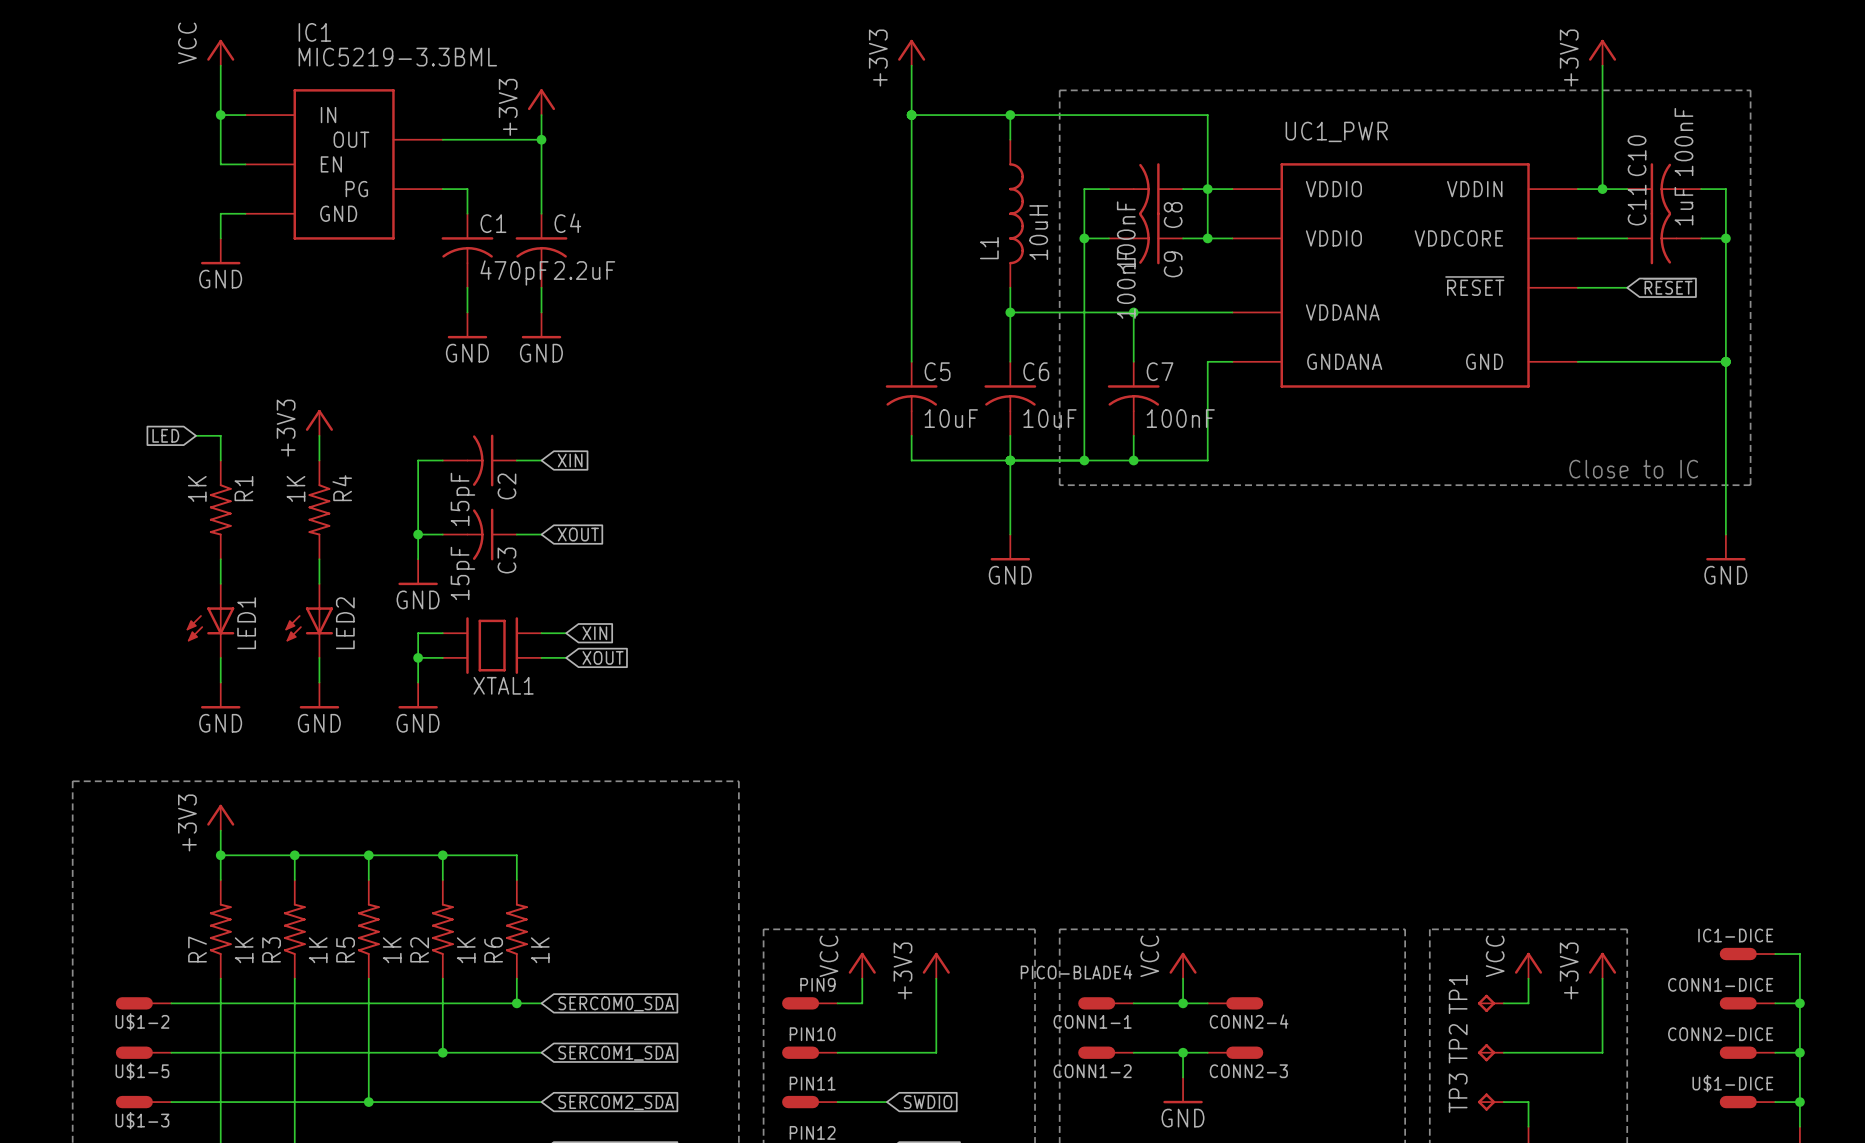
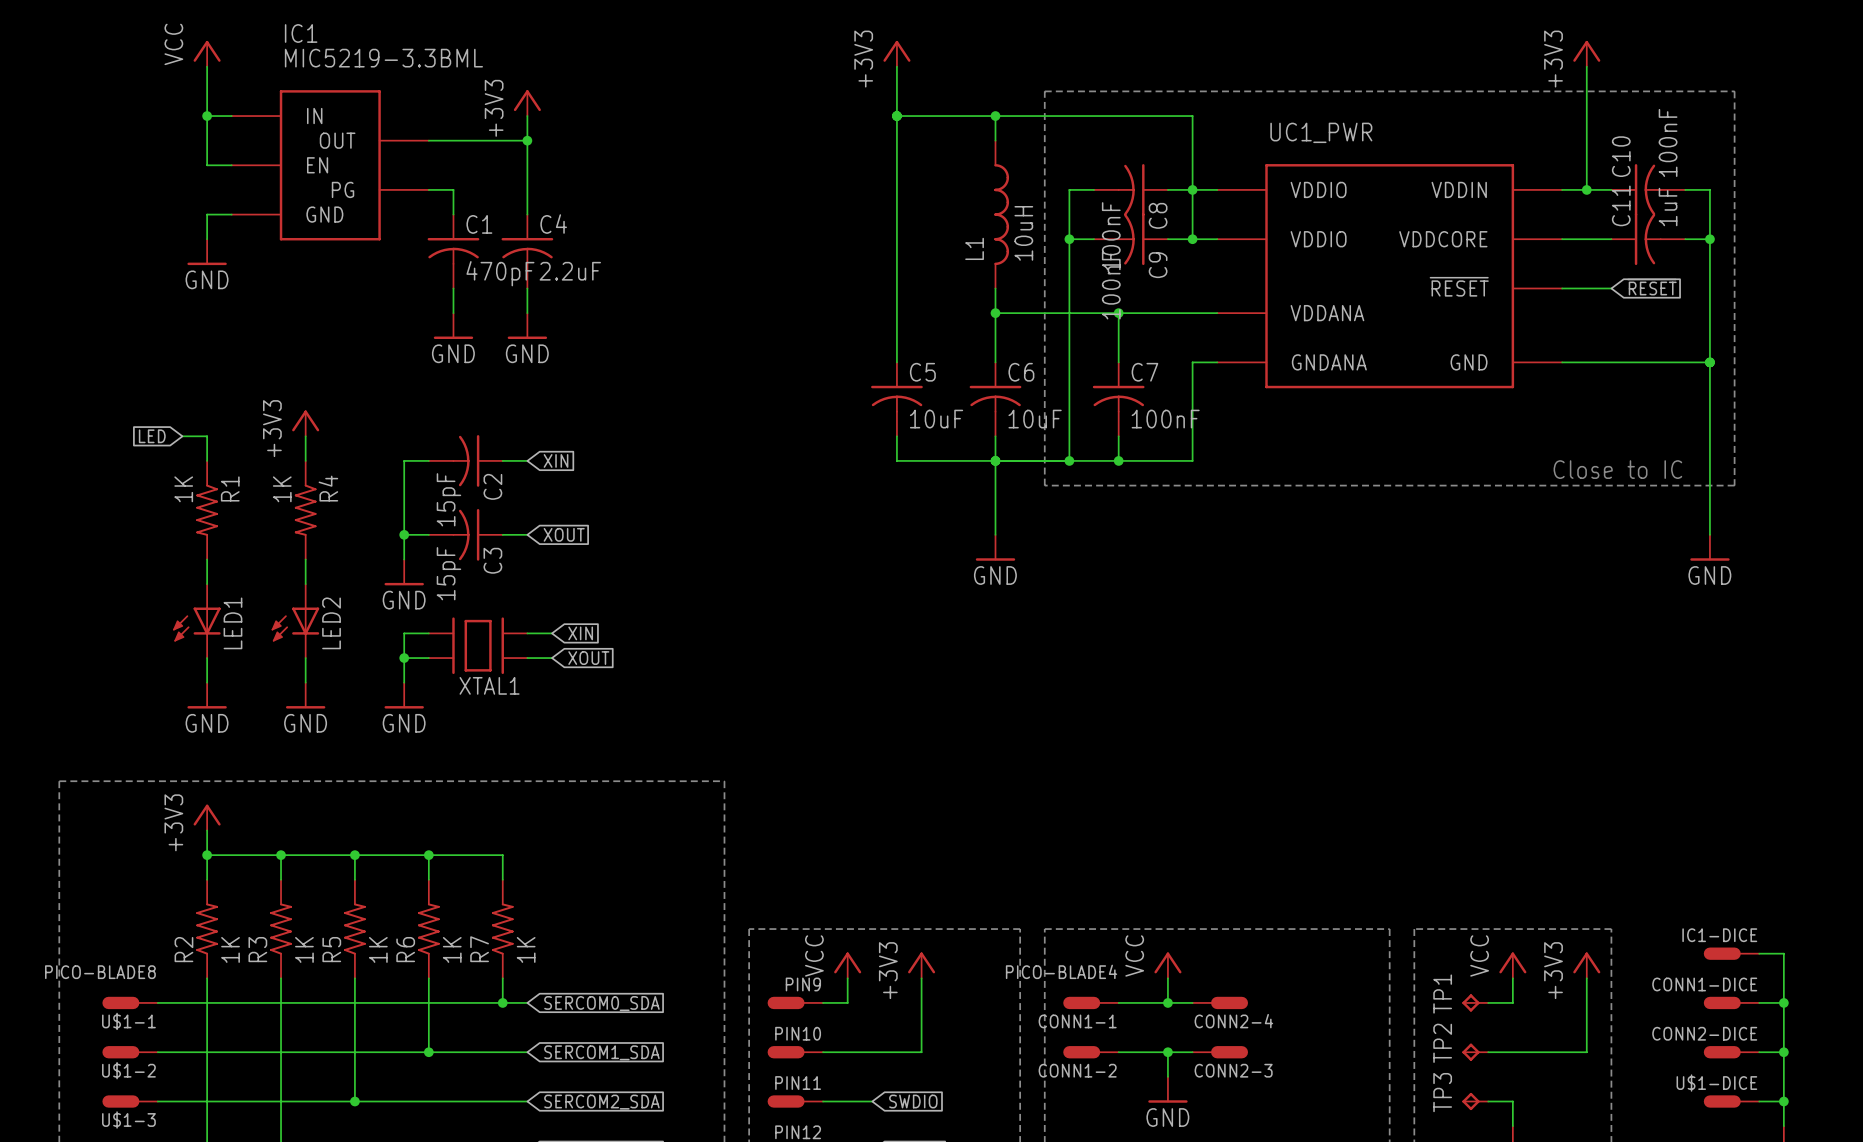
R7 name: R7 (197, 949) -> R2 (183, 949)
R2 name: R2 (419, 949) -> R6 (405, 949)
R6 name: R6 (493, 949) -> R7 (479, 949)
U$1-2 value: none -> PICO-BLADE8 (100, 972)
U$1-2 name: U$1-2 (142, 1021) -> U$1-1 (128, 1021)
U$1-5 name: U$1-5 (142, 1071) -> U$1-2 (128, 1070)

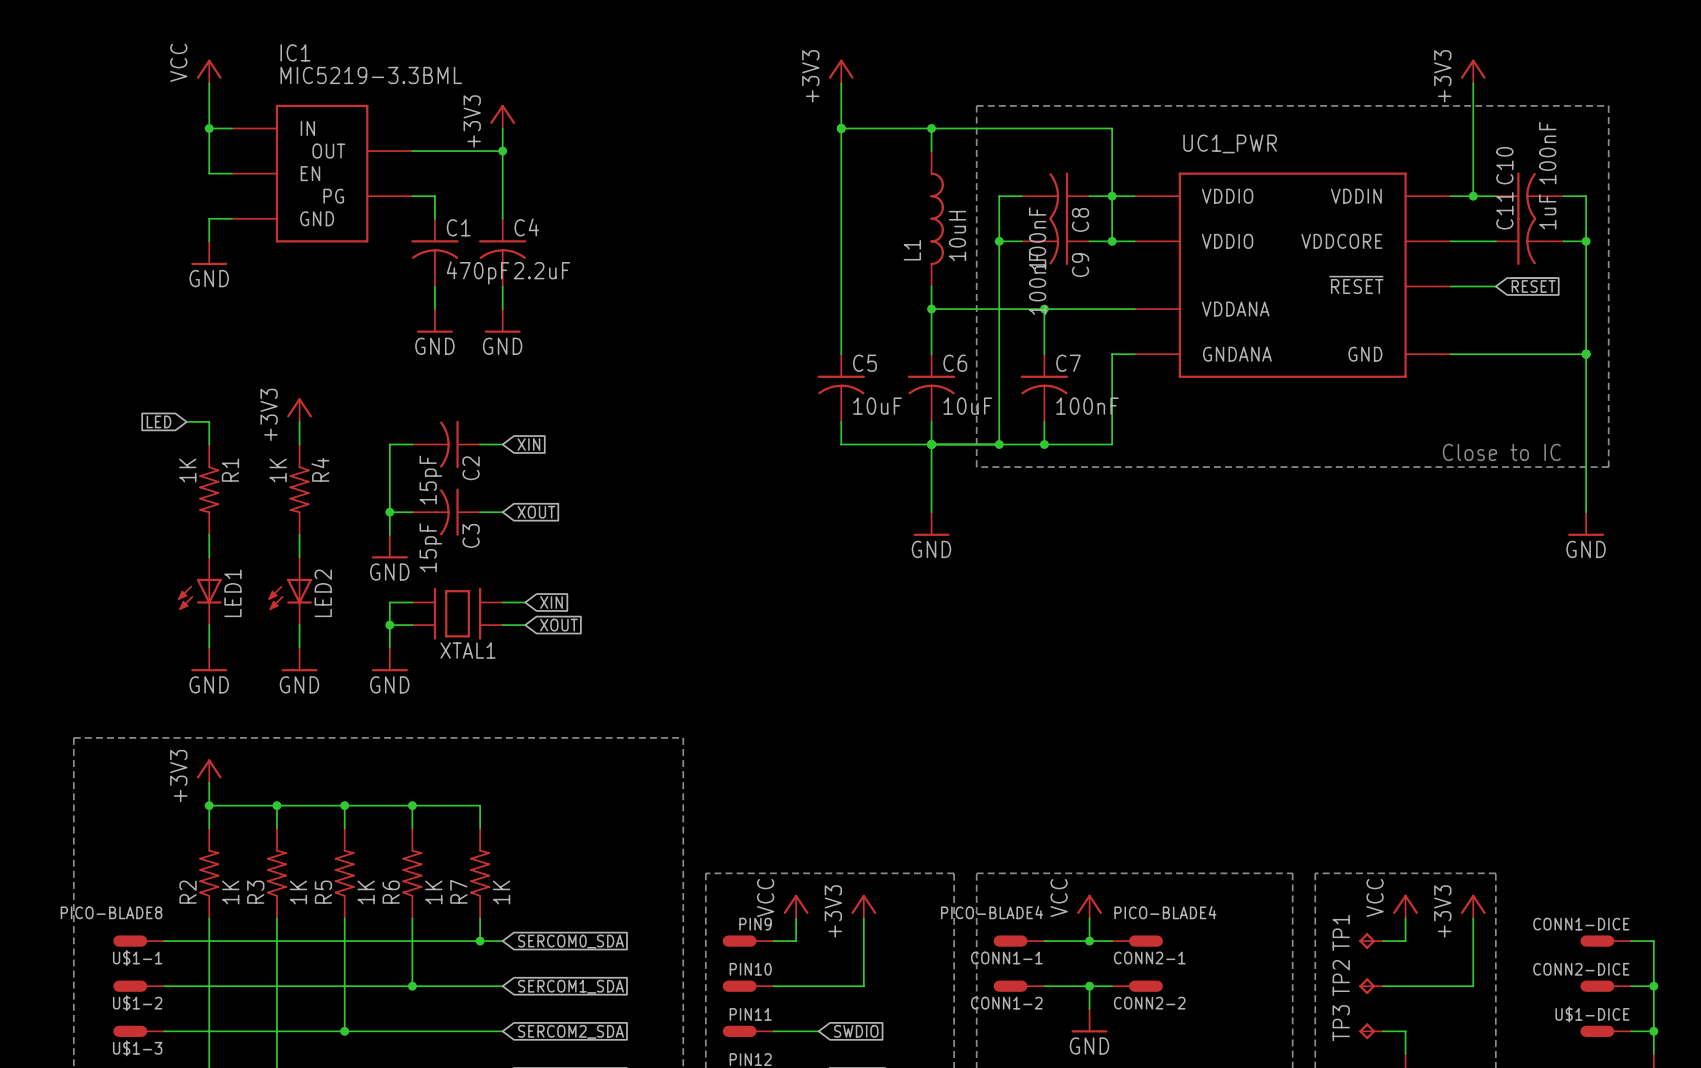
IC1-DICE: (1731, 953) -> none
wire: (1759, 953) (1783, 953) (1783, 1002) -> none
CONN2-4 value: none -> PICO-BLADE4 (1165, 912)
junction: (1783, 1002) -> none
CONN2-4 name: CONN2-4 (1233, 1021) -> CONN2-1 (1149, 957)
CONN2-3 name: CONN2-3 (1233, 1070) -> CONN2-2 (1149, 1003)

